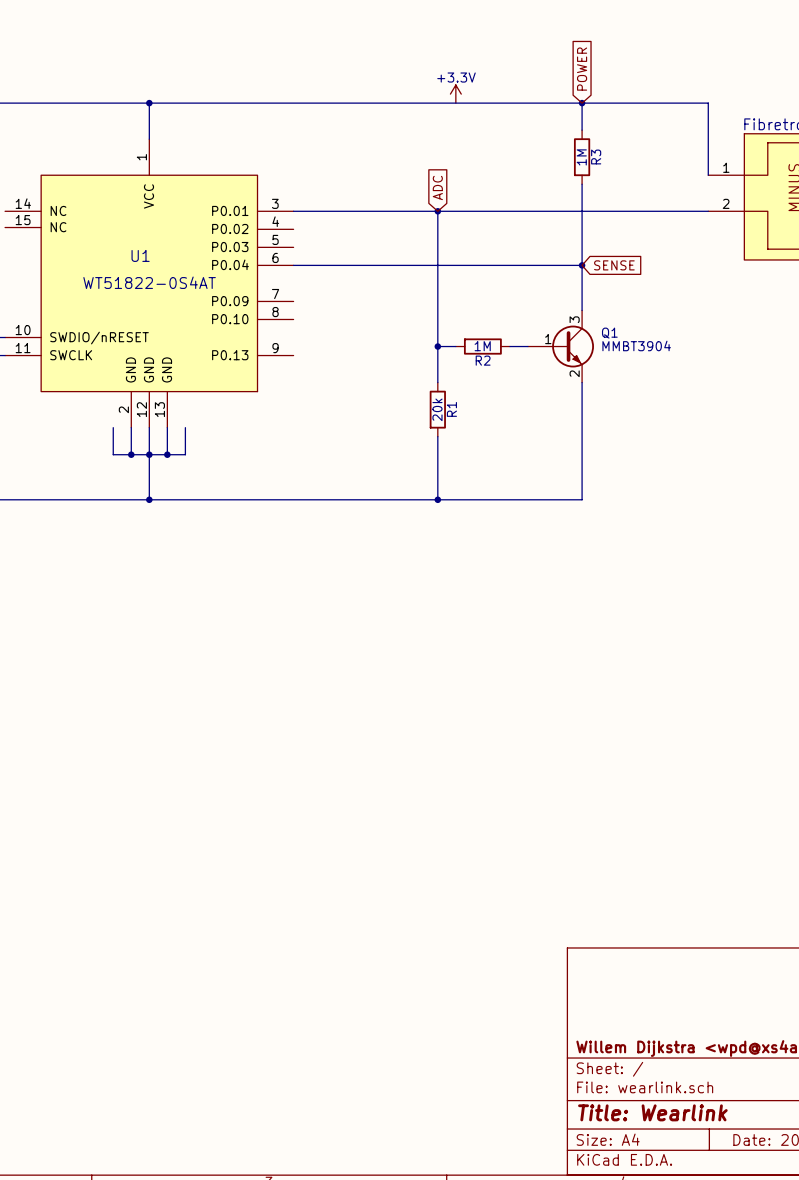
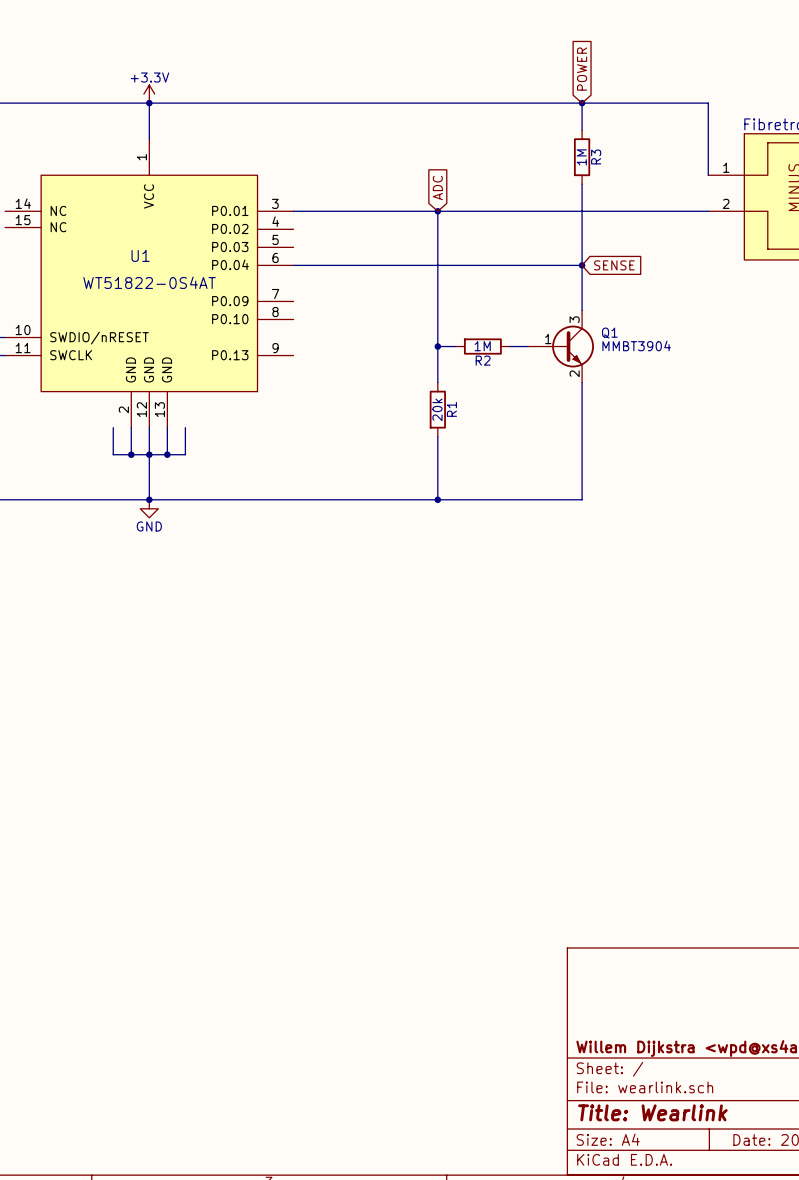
power symbol: none -> +3.3V (149, 94)
power symbol: +3.3V (455, 94) -> none
power symbol: none -> GND (149, 508)

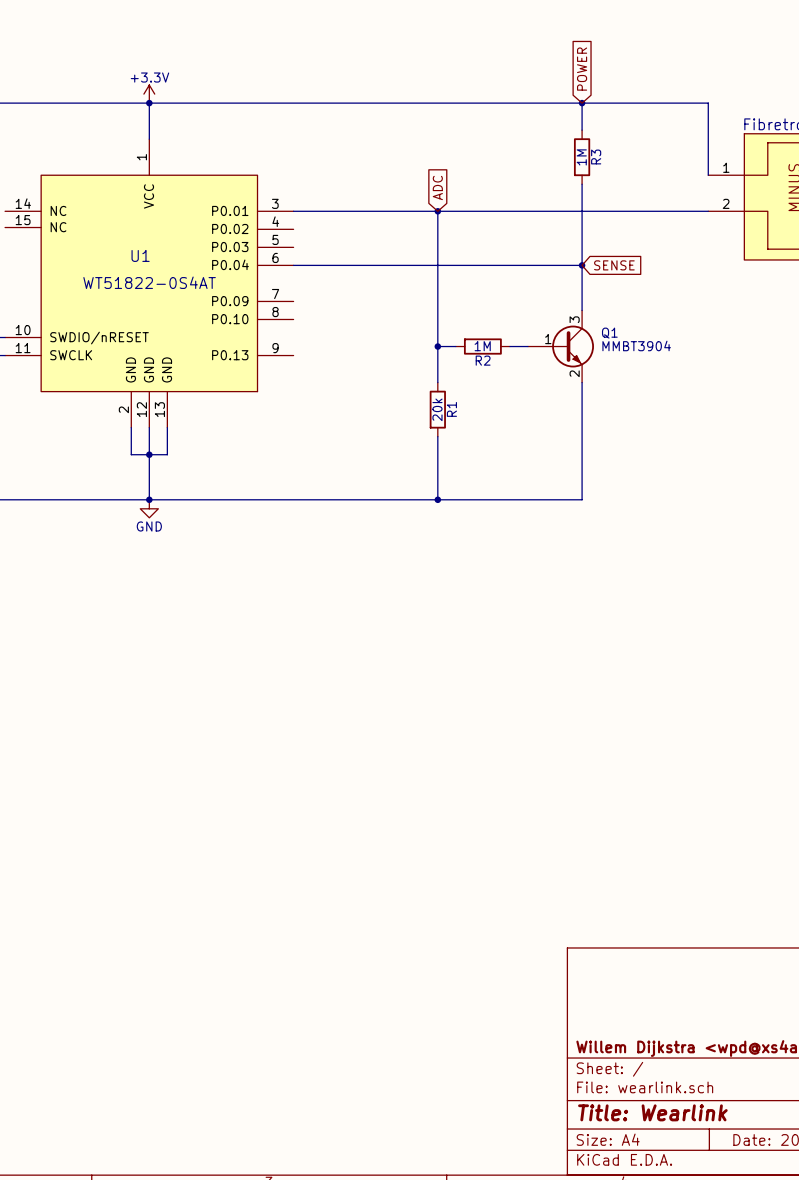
wire: (113, 427) (113, 454) (131, 454) -> none
wire: (185, 427) (185, 454) (167, 454) -> none
junction: (131, 454) -> none
junction: (167, 454) -> none

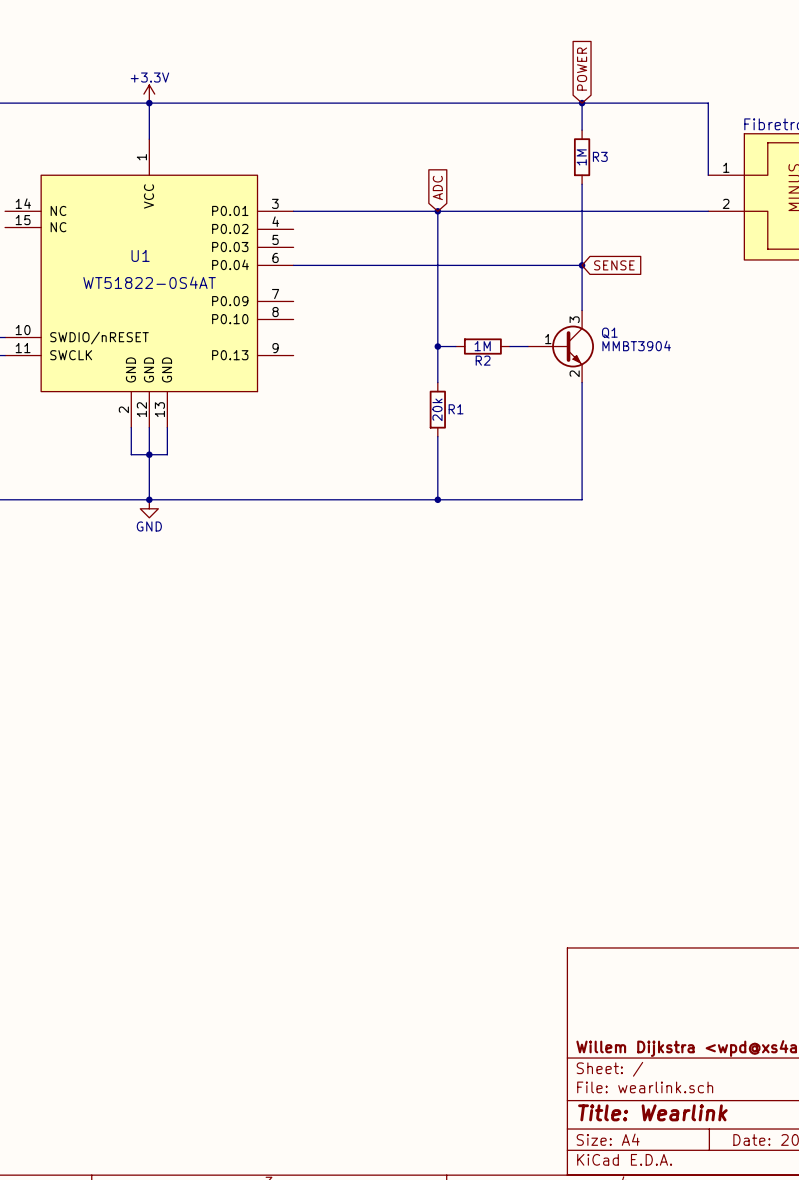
R3 name rotation: 0° (596, 156) -> 90° clockwise (600, 156)
R1 name rotation: 0° (451, 409) -> 90° clockwise (456, 409)

